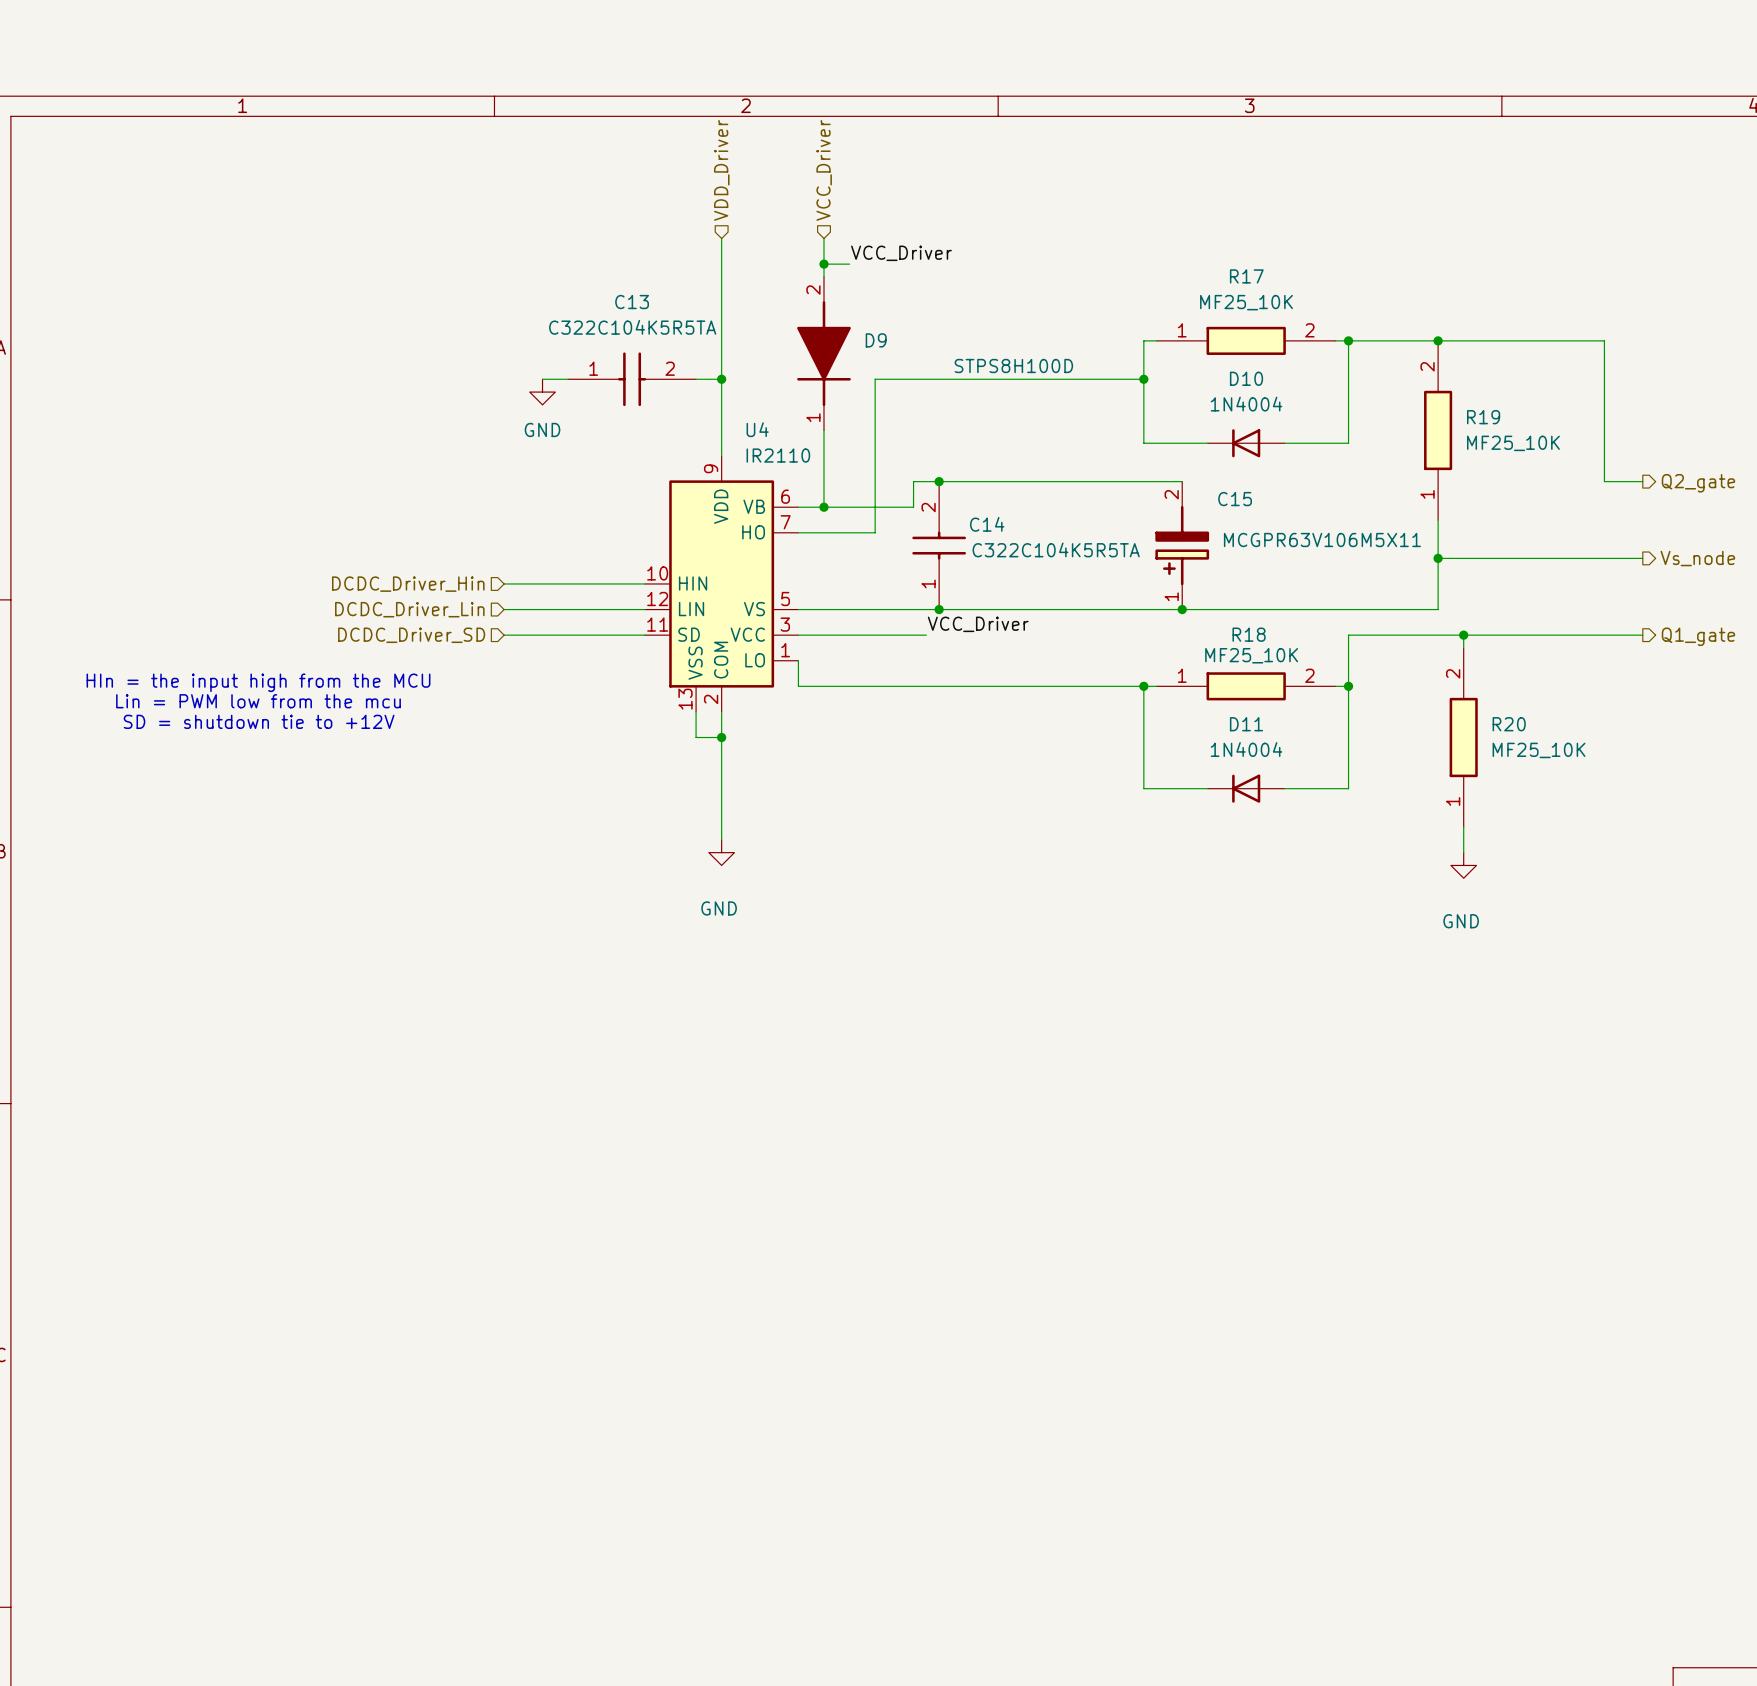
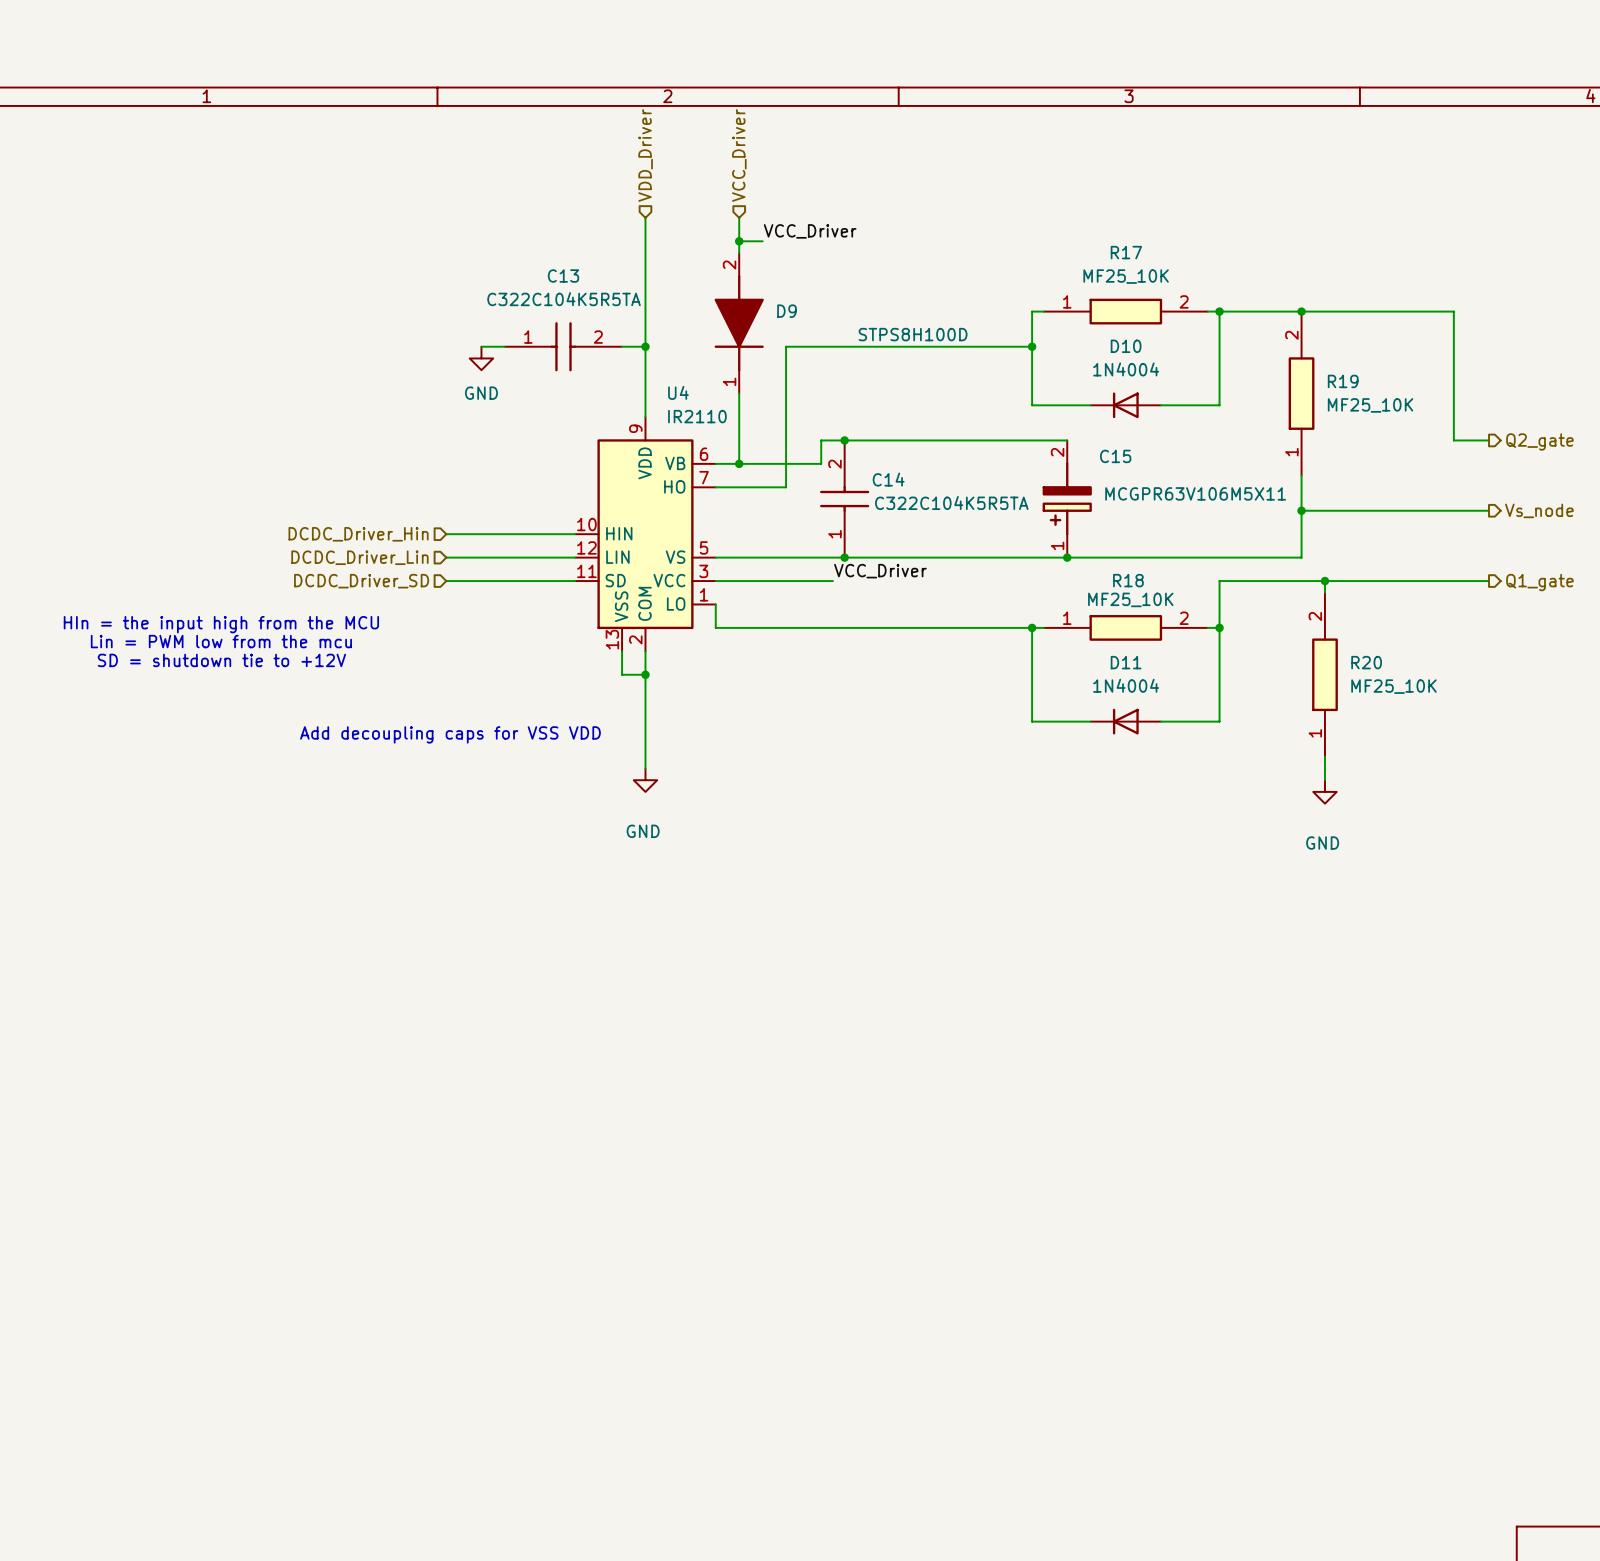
text: none -> Add decoupling caps for VSS VDD (450, 734)

